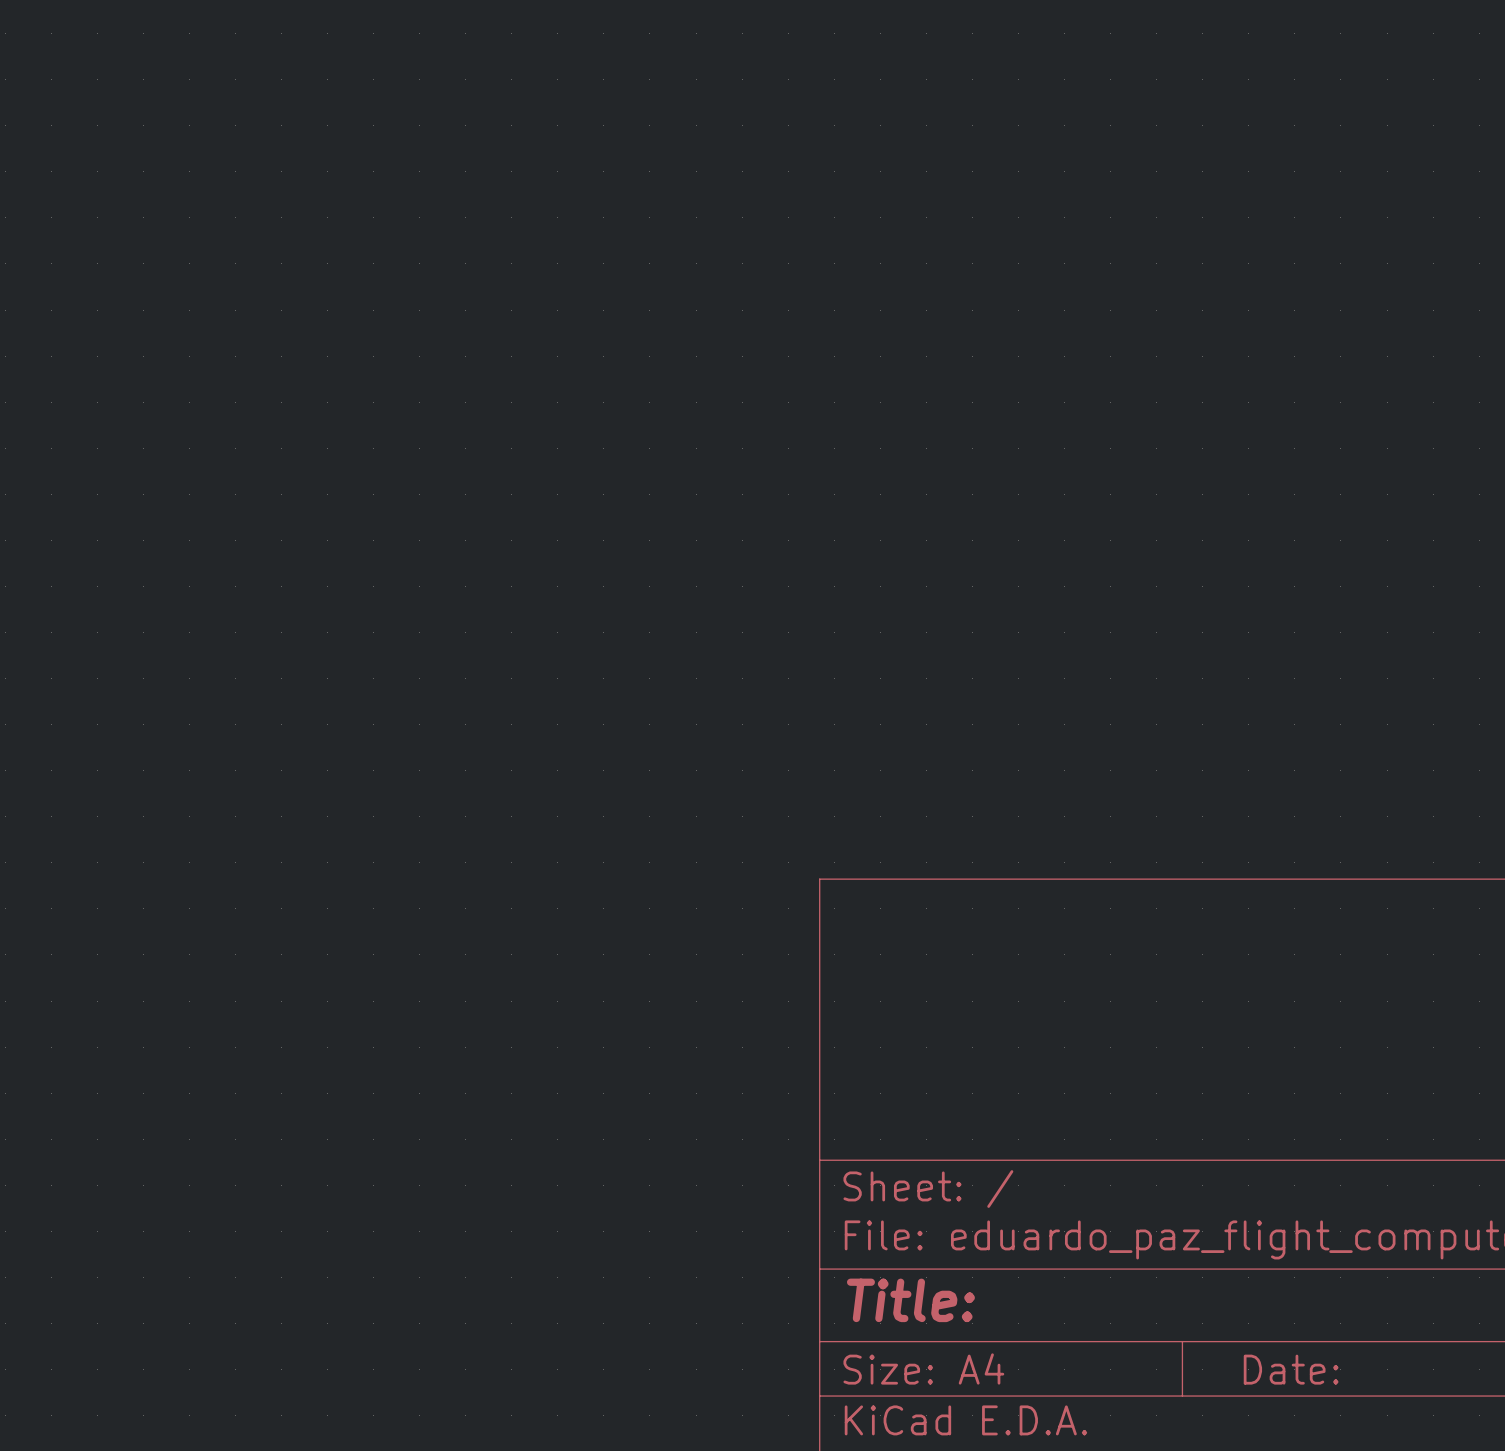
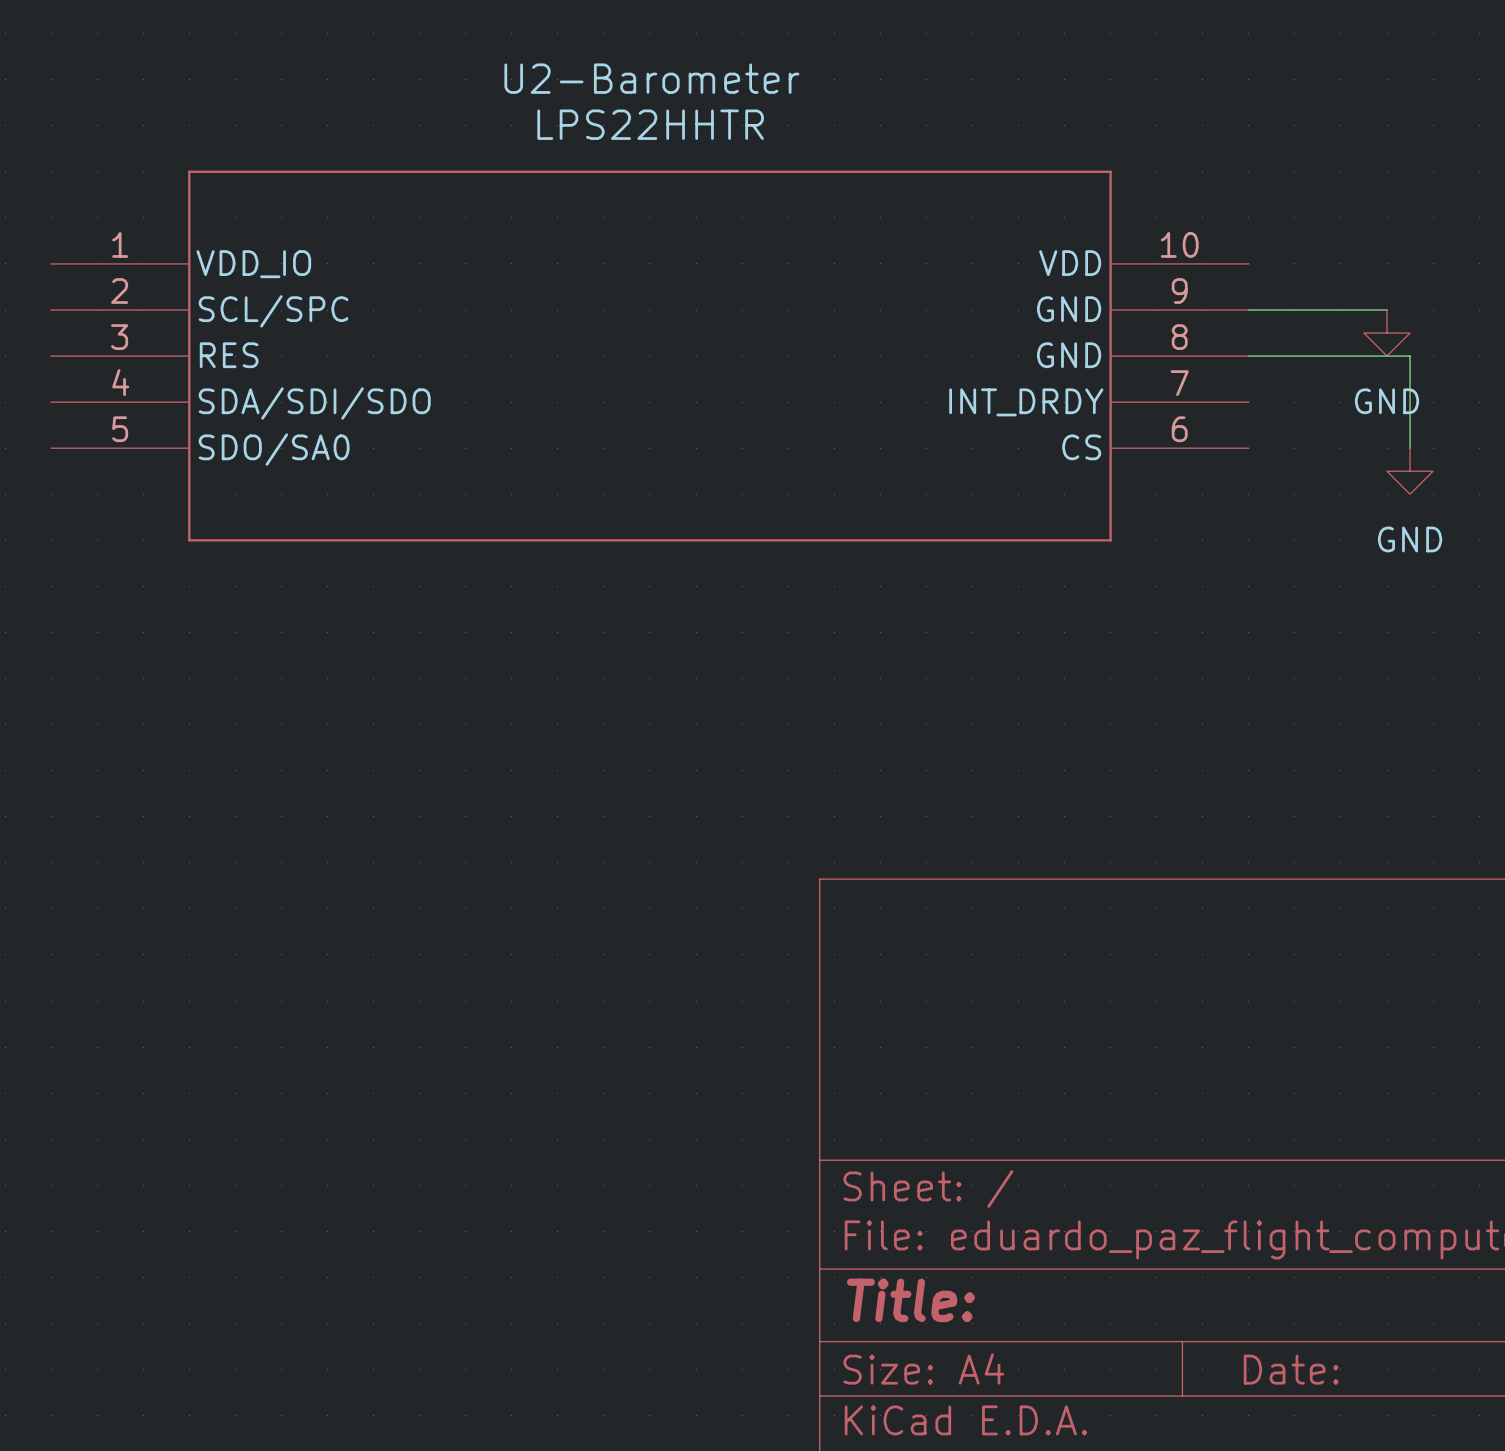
wire: none -> (1248, 310) (1387, 310)
power symbol: none -> GND (1387, 333)
U2-Barometer: none -> LPS22HHTR (649, 356)
wire: none -> (1248, 356) (1410, 356) (1410, 448)
power symbol: none -> GND (1410, 471)

